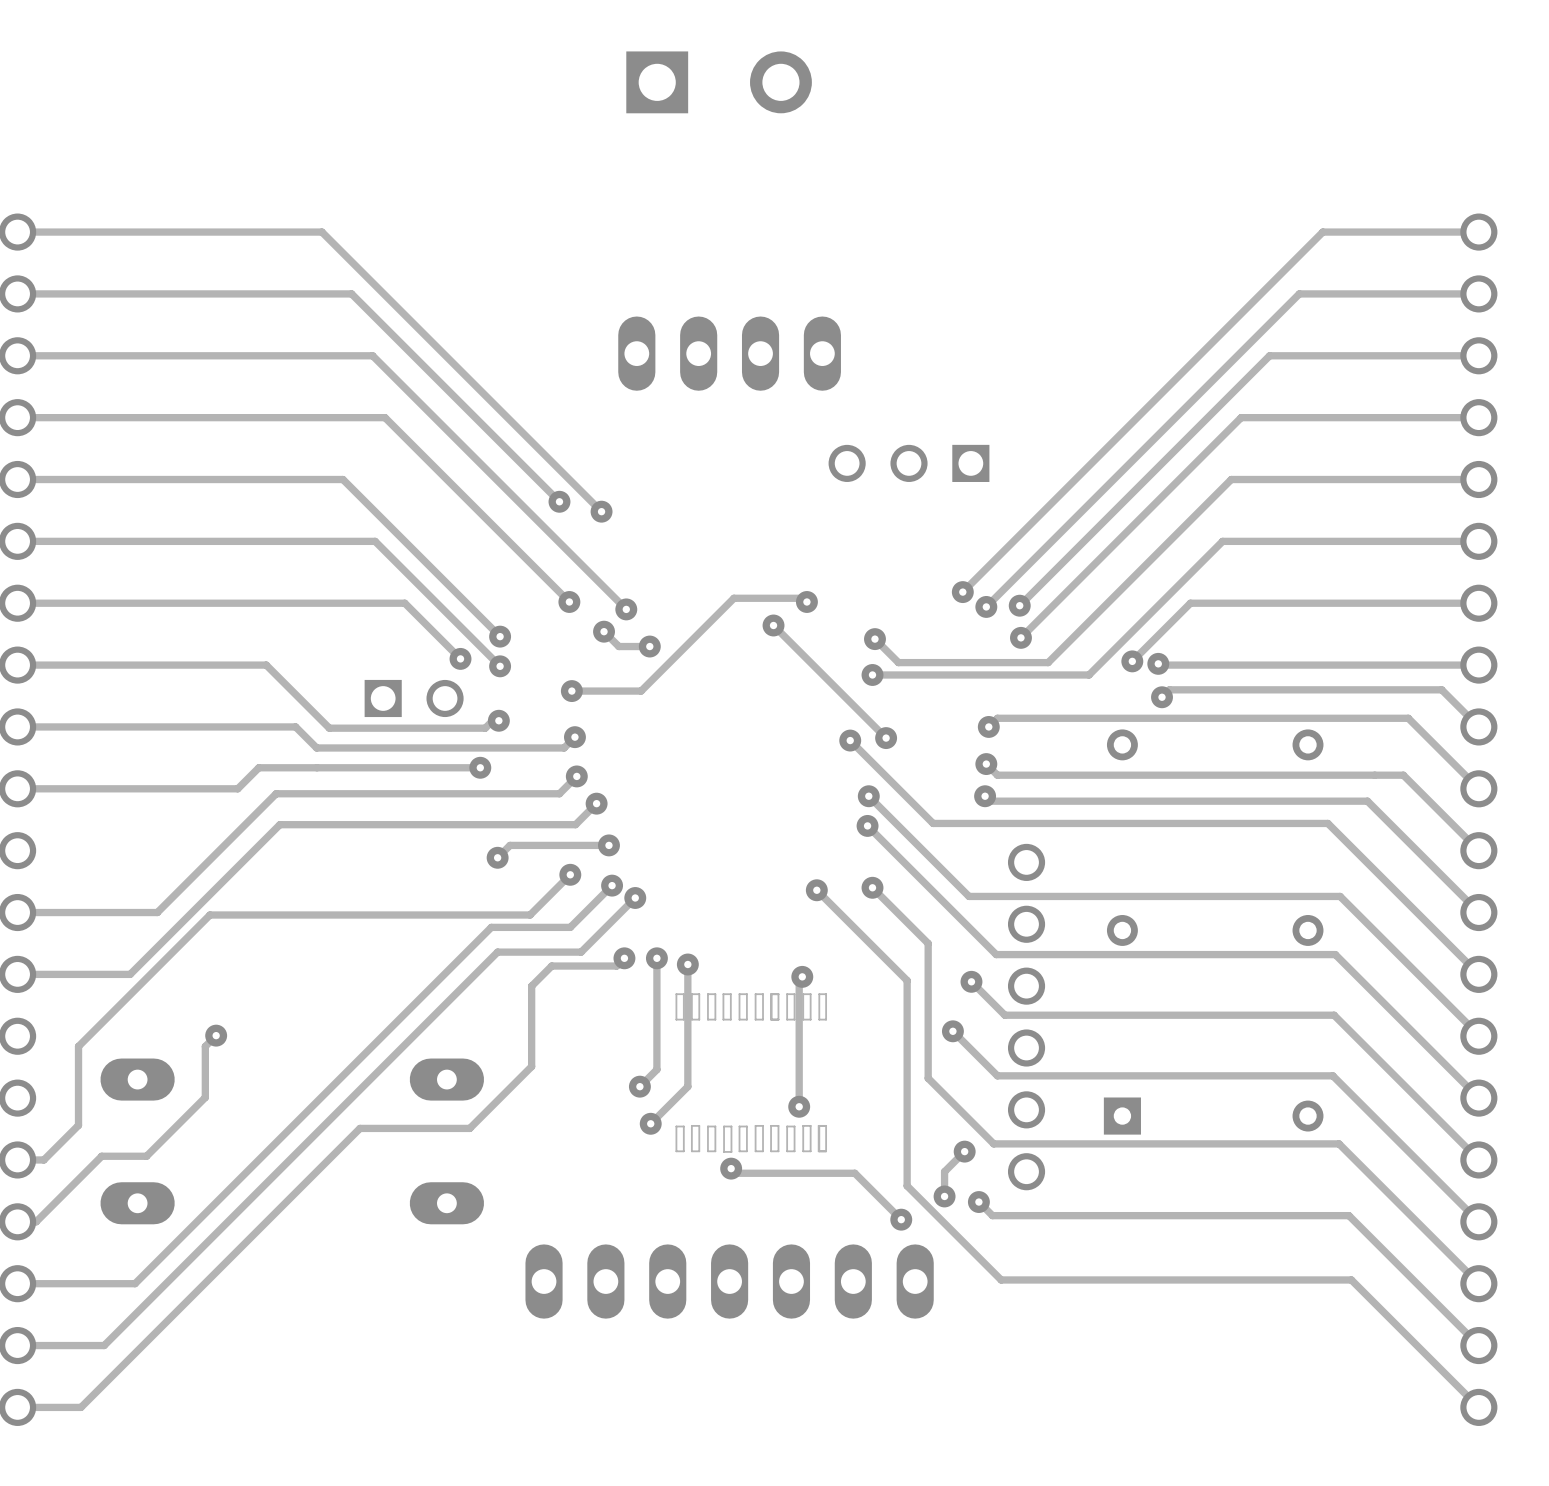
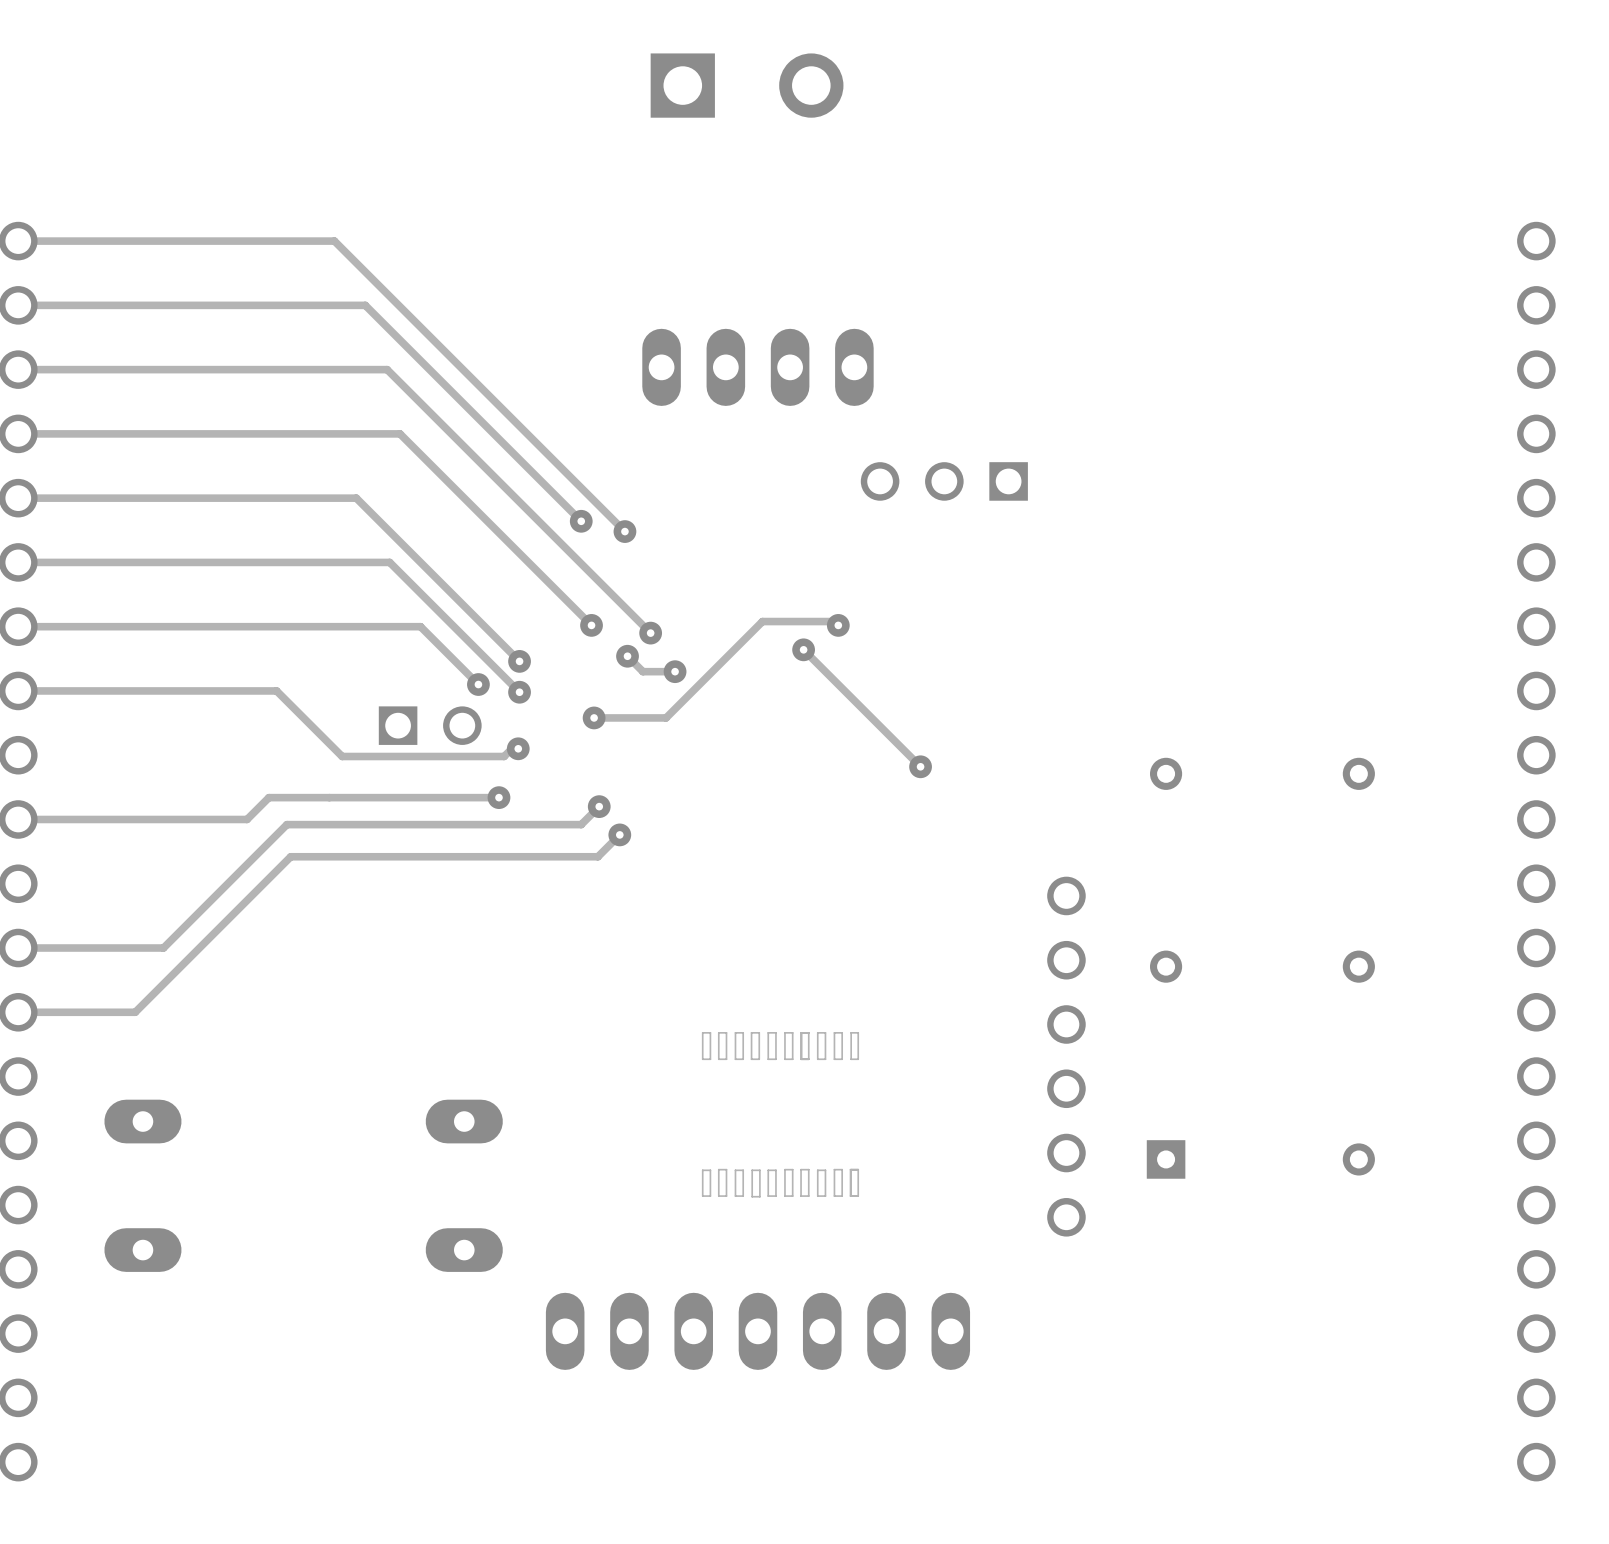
track: (1478, 232) (1322, 232) (962, 592) -> none
track: (1478, 293) (1299, 293) (986, 606) -> none
track: (1478, 355) (1269, 355) (1019, 605) -> none
track: (1478, 417) (1241, 417) (1020, 637) -> none
track: (1478, 479) (1231, 479) (1048, 662) (898, 662) (874, 639) -> none
track: (1478, 541) (1222, 541) (1089, 674) (872, 674) -> none
via: (962, 592) -> none
track: (1478, 603) (1190, 603) (1132, 661) -> none
via: (1019, 605) -> none
via: (986, 606) -> none
via: (1020, 637) -> none
via: (874, 639) -> none
via: (1132, 661) -> none
track: (1158, 663) (1478, 665) -> none
via: (1158, 663) -> none
via: (872, 674) -> none
track: (1162, 697) (1169, 689) (1441, 689) (1478, 726) -> none
via: (1162, 697) -> none
track: (17, 726) (295, 726) (316, 747) (564, 747) (574, 737) -> none
track: (988, 726) (997, 718) (1408, 718) (1478, 788) -> none
via: (988, 726) -> none
via: (574, 737) -> none
track: (850, 740) (933, 823) (1327, 823) (1478, 974) -> none
via: (850, 740) -> none
track: (986, 764) (997, 775) (1403, 775) (1478, 850) -> none
via: (986, 764) -> none
track: (868, 796) (969, 896) (1340, 896) (1478, 1036) -> none
via: (868, 796) -> none
track: (985, 796) (990, 801) (1367, 801) (1478, 912) -> none
via: (985, 796) -> none
track: (867, 825) (996, 954) (1335, 954) (1478, 1098) -> none
via: (867, 825) -> none
track: (608, 845) (510, 845) (497, 857) -> none
via: (608, 845) -> none
via: (497, 857) -> none
track: (570, 874) (530, 915) (209, 915) (78, 1046) (78, 1125) (43, 1159) (17, 1159) -> none
via: (570, 874) -> none
track: (612, 885) (570, 927) (491, 927) (135, 1283) (17, 1283) -> none
via: (612, 885) -> none
track: (872, 887) (928, 943) (928, 1078) (993, 1143) (1339, 1143) (1478, 1283) -> none
via: (872, 887) -> none
track: (816, 890) (907, 980) (907, 1185) (1001, 1279) (1351, 1279) (1478, 1407) -> none
via: (816, 890) -> none
track: (635, 897) (581, 952) (497, 952) (104, 1345) (17, 1345) -> none
via: (635, 897) -> none
track: (624, 958) (616, 966) (551, 966) (531, 986) (531, 1066) (469, 1128) (359, 1128) (81, 1407) (17, 1407) -> none
via: (624, 958) -> none
track: (656, 958) (656, 1069) (639, 1086) -> none
via: (656, 958) -> none
track: (687, 964) (687, 1086) (650, 1123) -> none
via: (687, 964) -> none
track: (802, 976) (799, 979) (799, 1106) -> none
via: (802, 976) -> none
track: (971, 981) (1004, 1015) (1334, 1015) (1478, 1159) -> none
via: (971, 981) -> none
track: (952, 1031) (997, 1075) (1332, 1075) (1478, 1221) -> none
via: (952, 1031) -> none
track: (216, 1035) (205, 1046) (205, 1097) (146, 1156) (101, 1156) (36, 1221) (17, 1221) -> none
via: (216, 1035) -> none
via: (639, 1086) -> none
via: (799, 1106) -> none
via: (650, 1123) -> none
track: (964, 1151) (944, 1171) (944, 1196) -> none
via: (964, 1151) -> none
track: (731, 1168) (735, 1173) (854, 1173) (901, 1219) -> none
via: (731, 1168) -> none
via: (944, 1196) -> none
track: (978, 1202) (992, 1215) (1348, 1215) (1478, 1345) -> none
via: (978, 1202) -> none
via: (901, 1219) -> none

